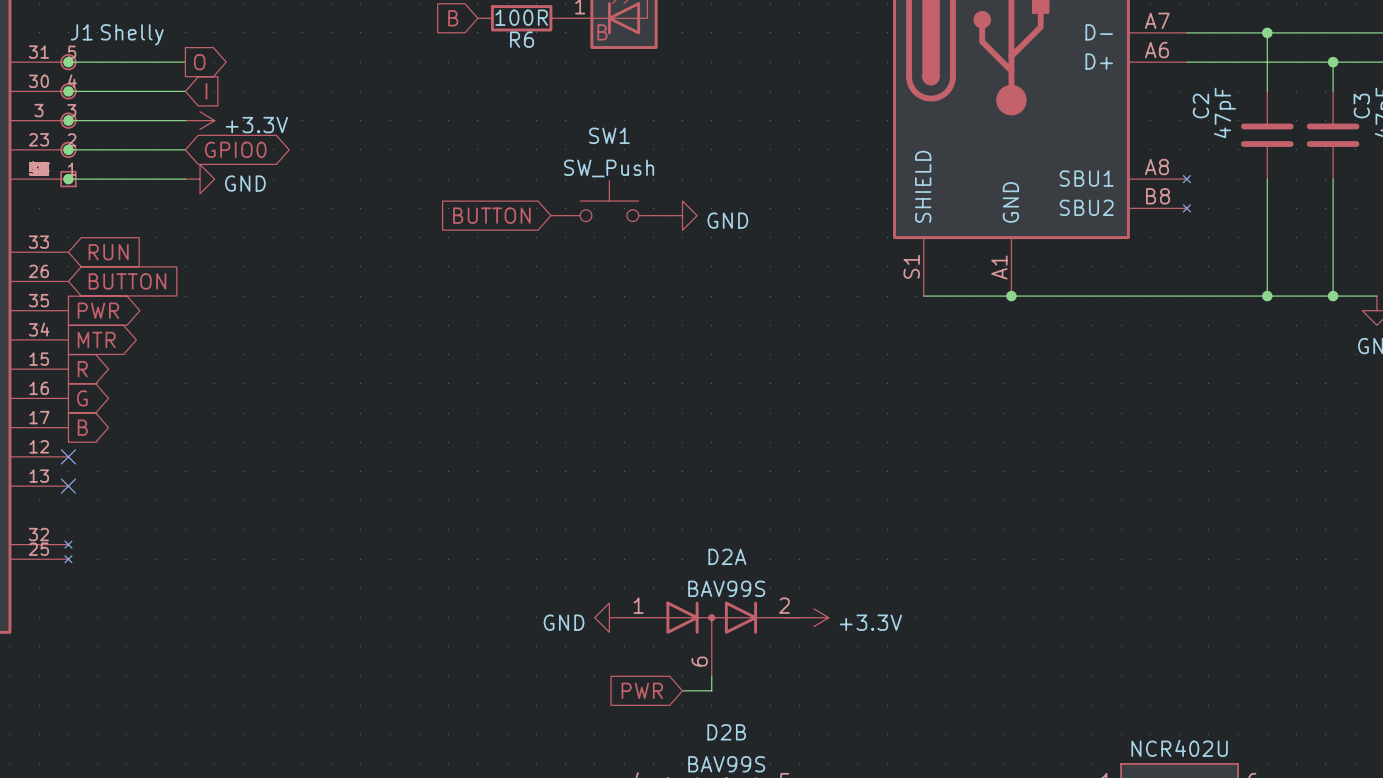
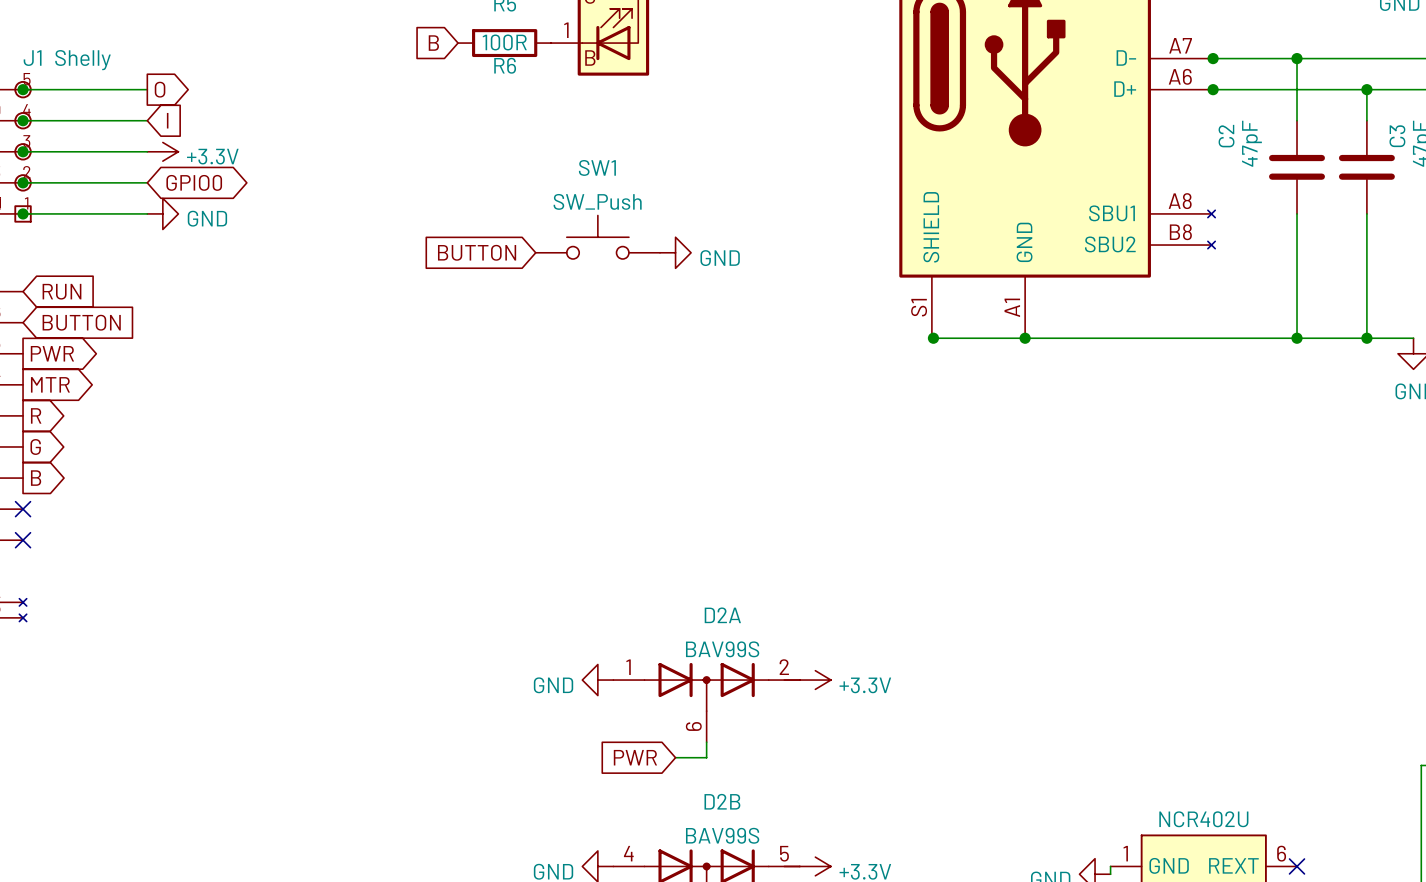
junction: none -> (1213, 58)
junction: none -> (1213, 89)
junction: none -> (933, 338)

